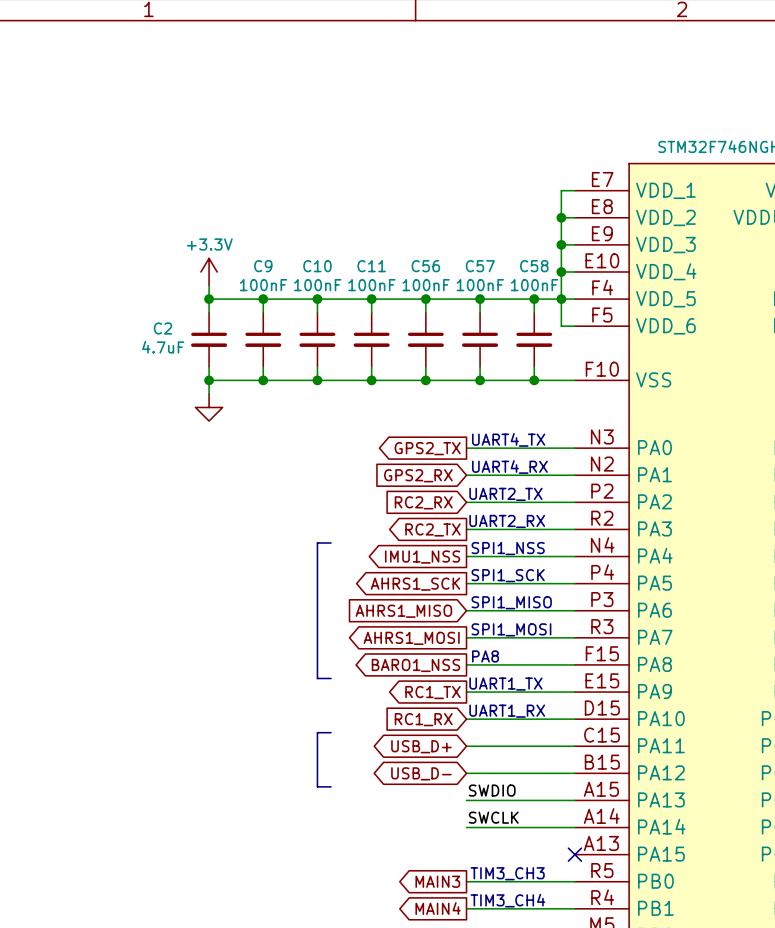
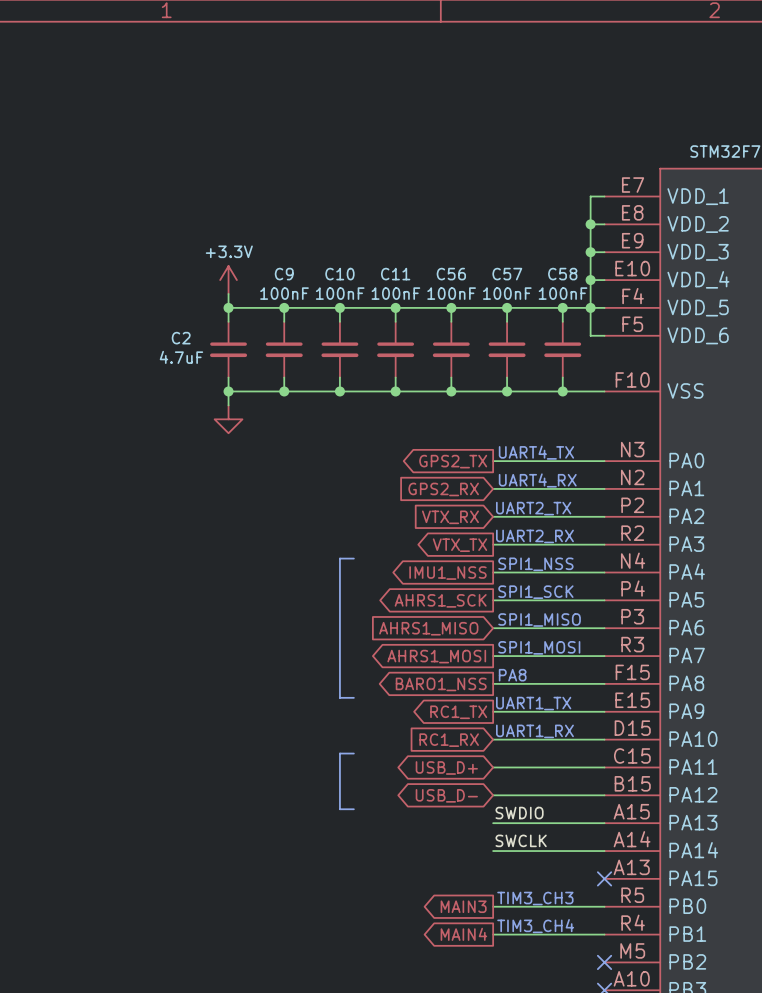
global label: RC2_RX (423, 502) -> VTX_RX (450, 517)
global label: RC2_TX (432, 529) -> VTX_TX (459, 545)

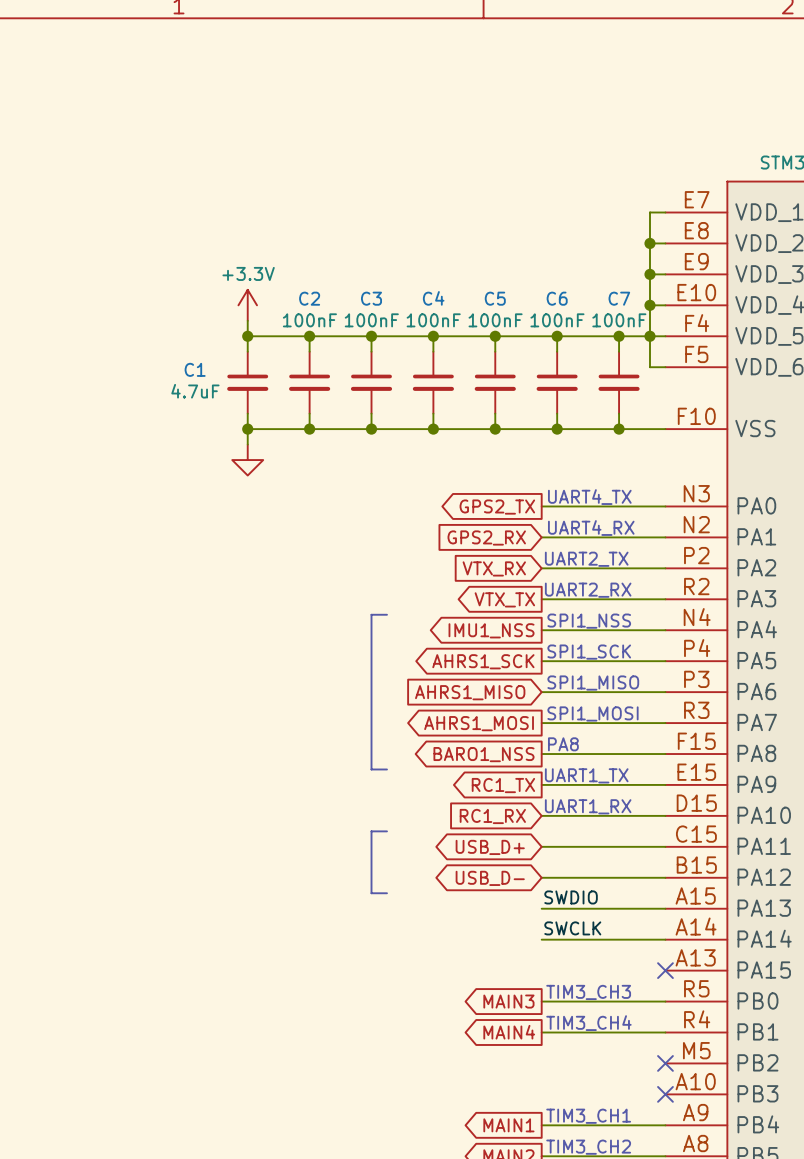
C9 name: C9 (284, 274) -> C2 (309, 298)
C10 name: C10 (339, 274) -> C3 (371, 298)
C11 name: C11 (395, 274) -> C4 (433, 298)
C56 name: C56 (451, 274) -> C5 (495, 298)
C57 name: C57 (507, 274) -> C6 (557, 298)
C58 name: C58 (562, 274) -> C7 (619, 298)
C2 name: C2 (181, 338) -> C1 (195, 369)

